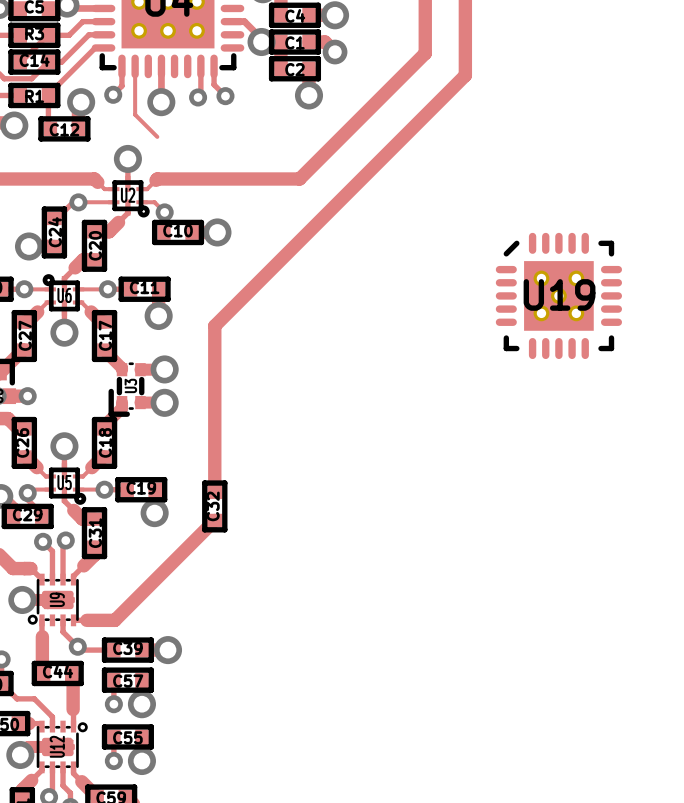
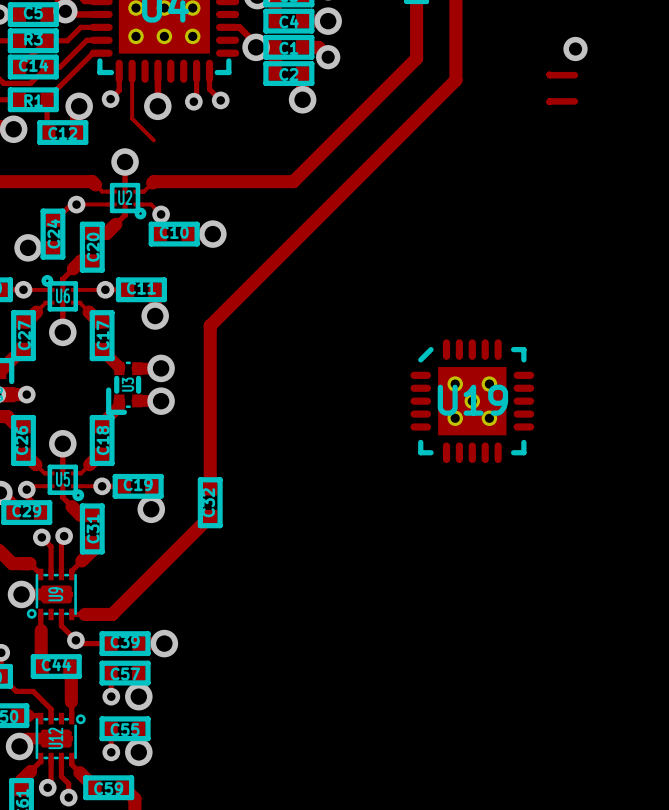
via: none -> (575, 48)
track: none -> (549, 74) (574, 75)
track: none -> (574, 101) (549, 102)
U19 position: (558, 295) -> (472, 401)

